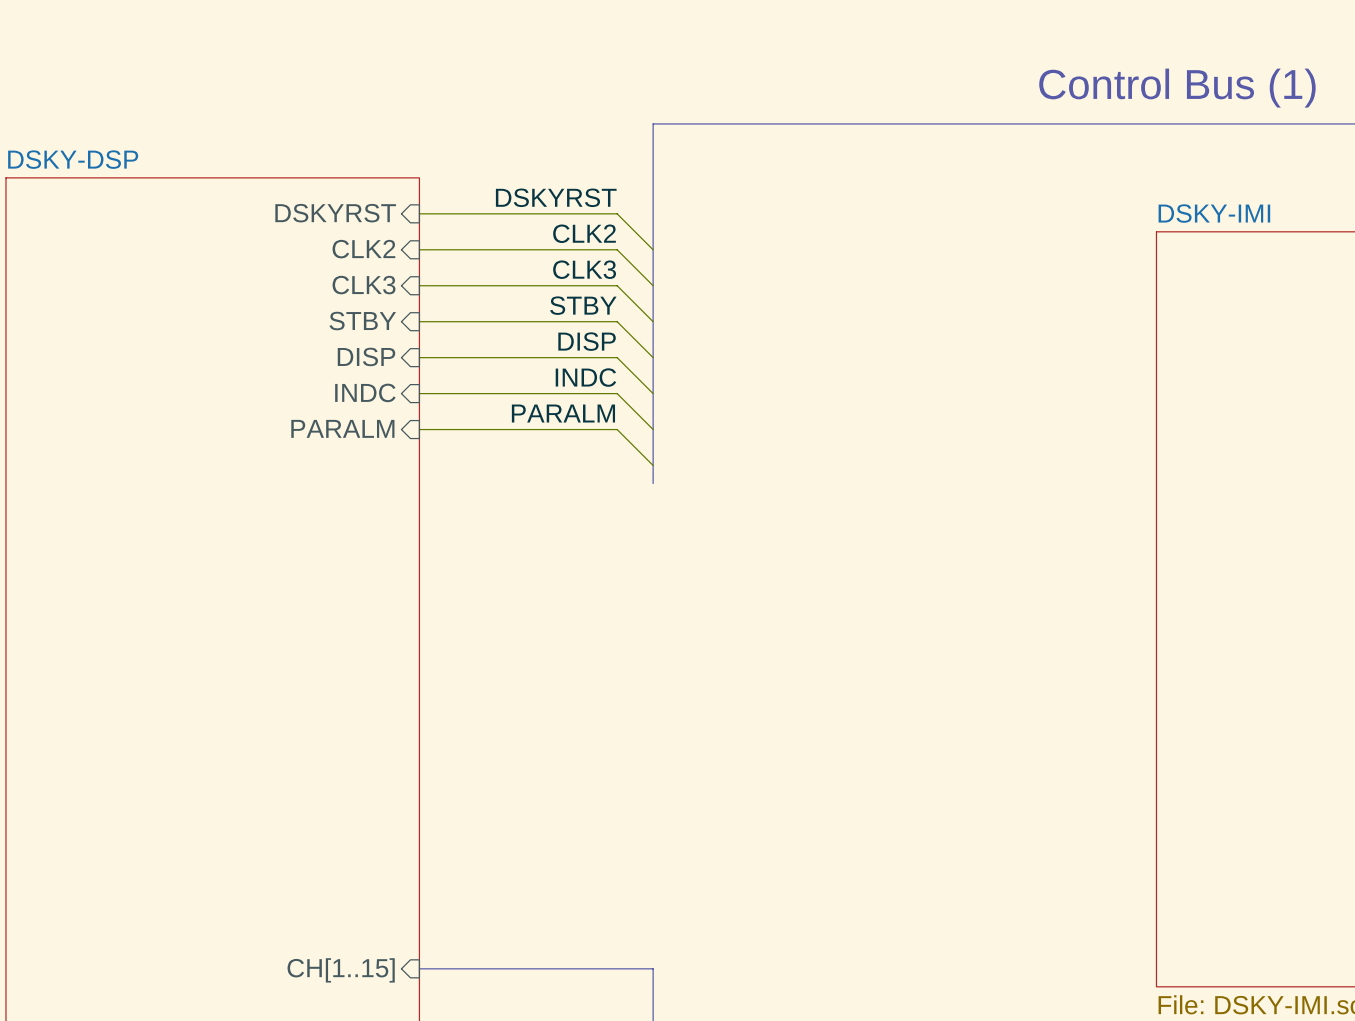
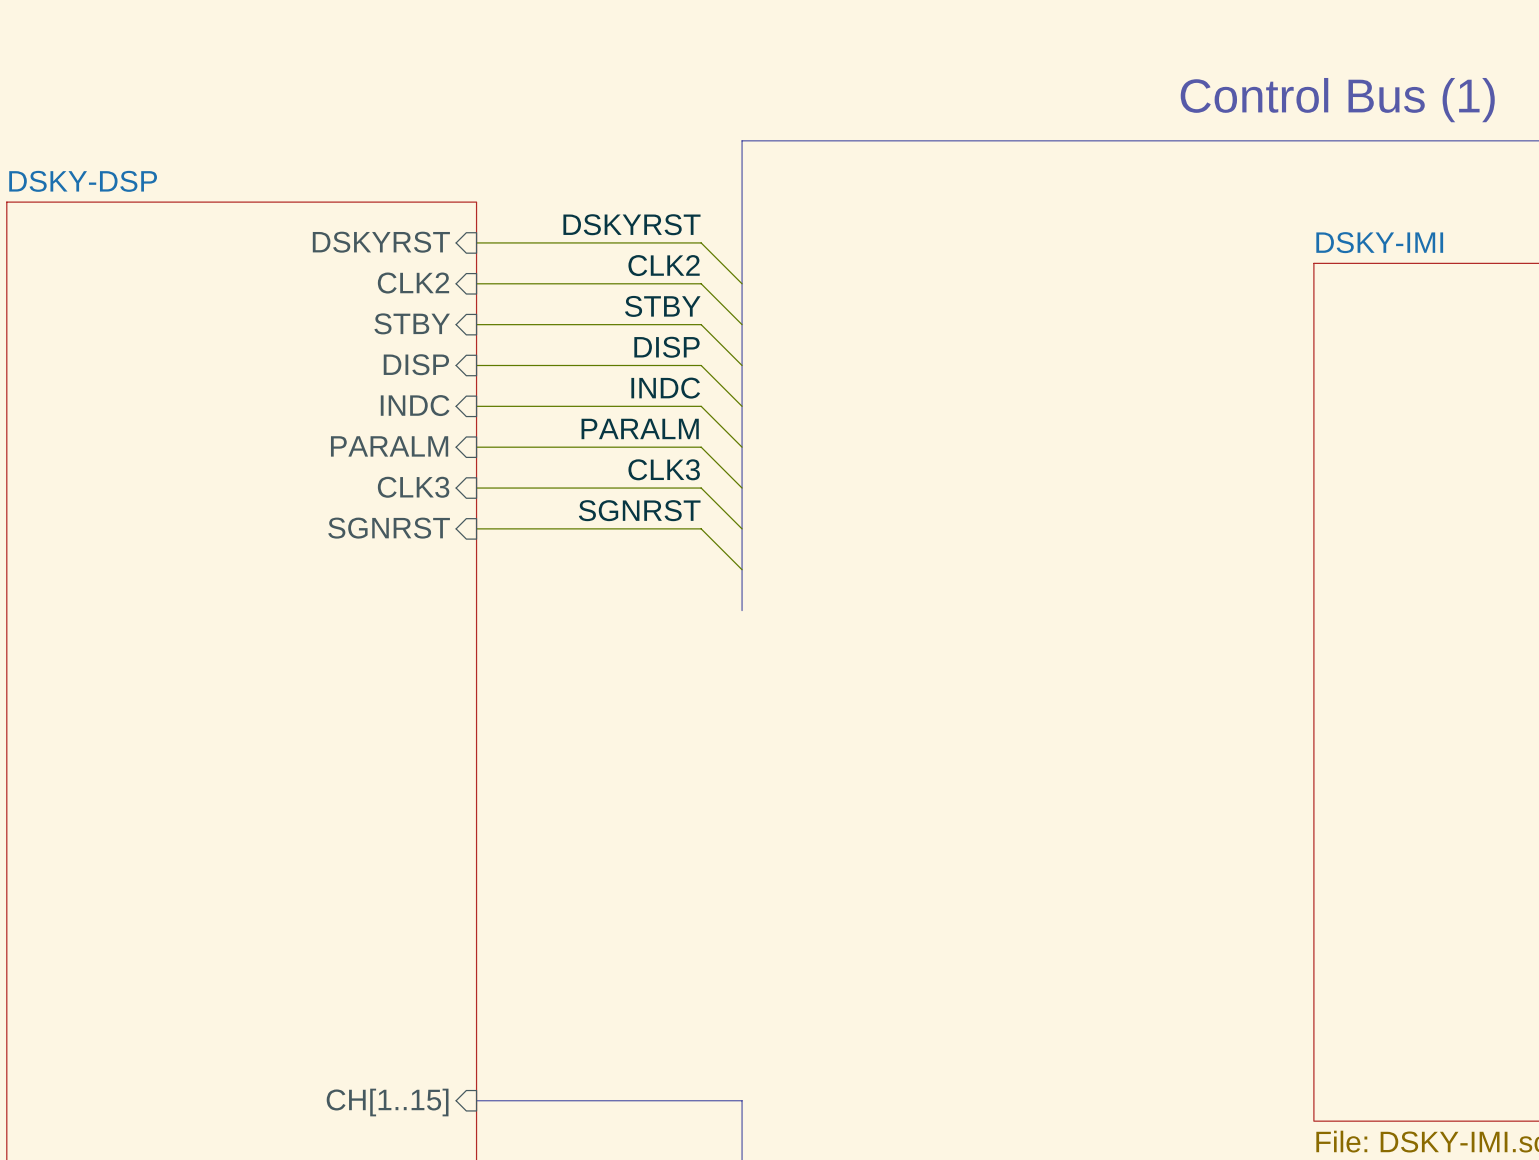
label: CLK3 (584, 269) -> STBY (662, 306)
sheet pin: CLK3 (364, 285) -> STBY (412, 323)
label: STBY (583, 305) -> DISP (666, 347)
sheet pin: STBY (362, 321) -> DISP (416, 364)
label: DISP (587, 341) -> INDC (665, 388)
sheet pin: DISP (366, 356) -> INDC (415, 405)
label: INDC (585, 377) -> PARALM (640, 428)
sheet pin: INDC (365, 392) -> PARALM (389, 446)
label: PARALM (563, 413) -> CLK3 (664, 469)
sheet pin: PARALM (342, 428) -> CLK3 (413, 487)
label: none -> SGNRST (639, 510)
sheet pin: none -> SGNRST (389, 528)
wire: none -> (476, 528) (701, 528) (742, 569)
bus: none -> (742, 549) (742, 610)

